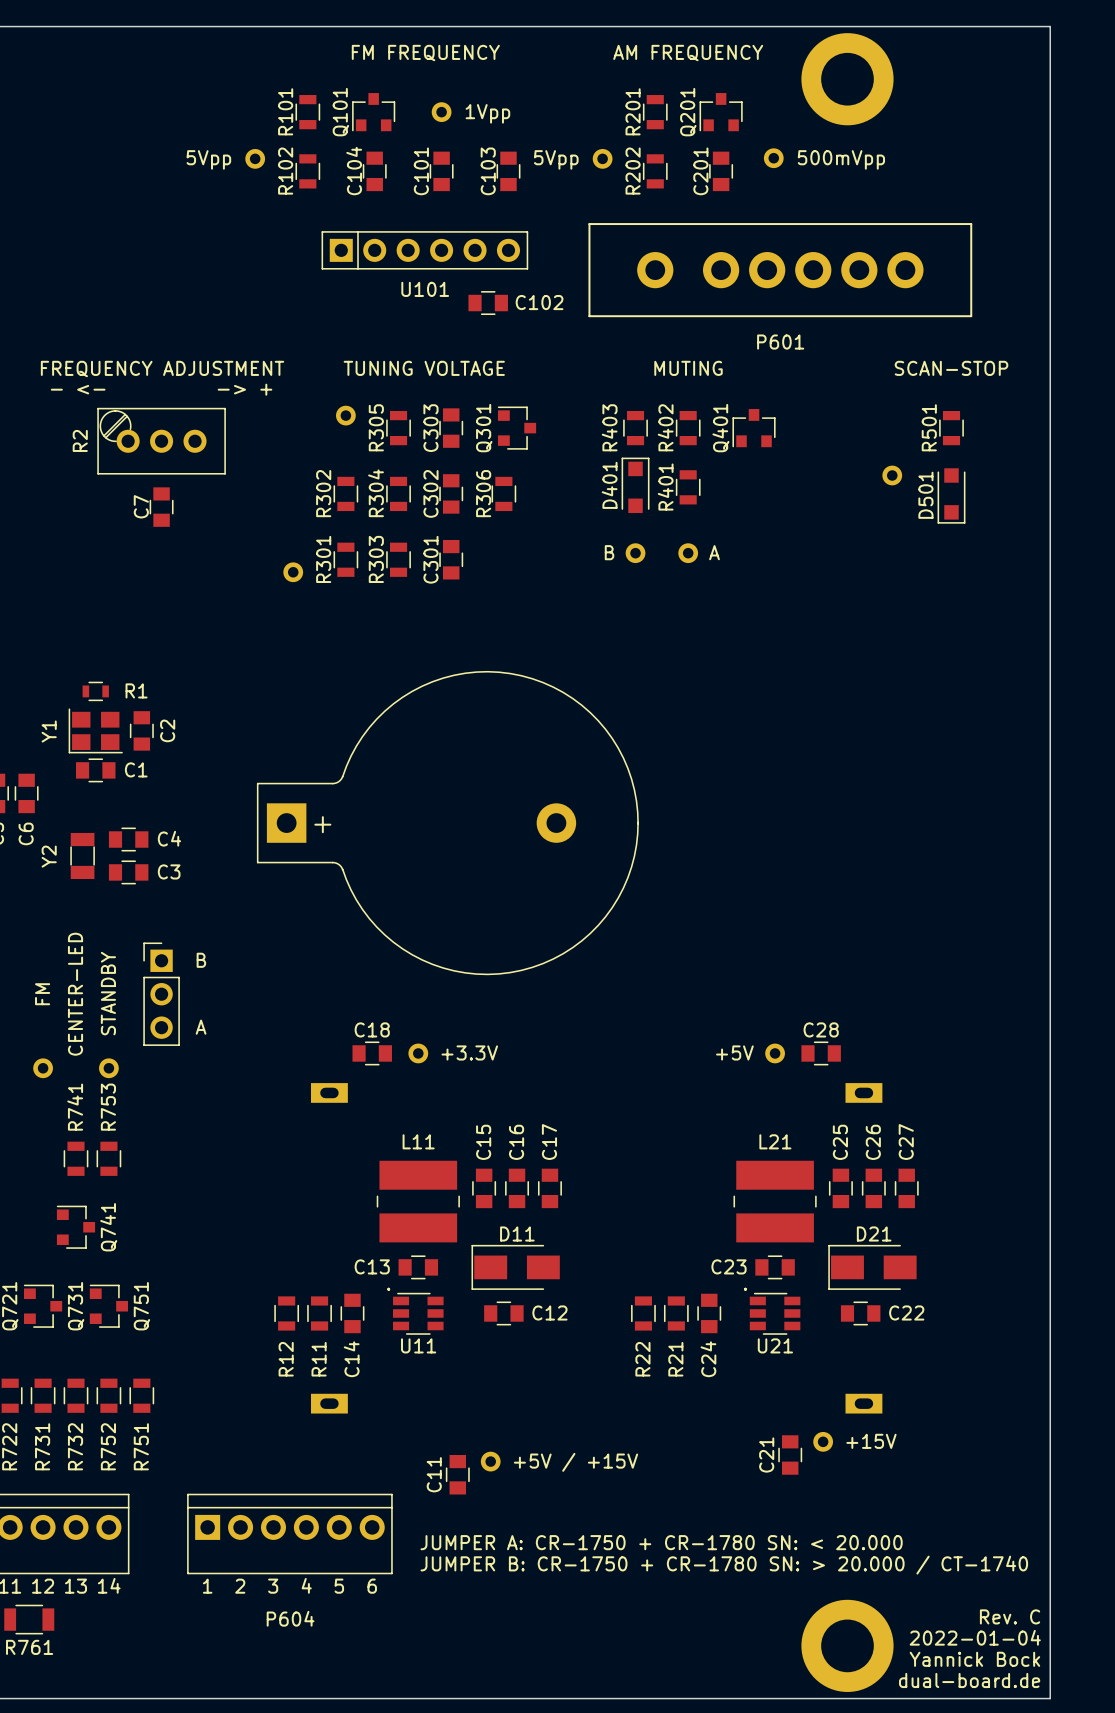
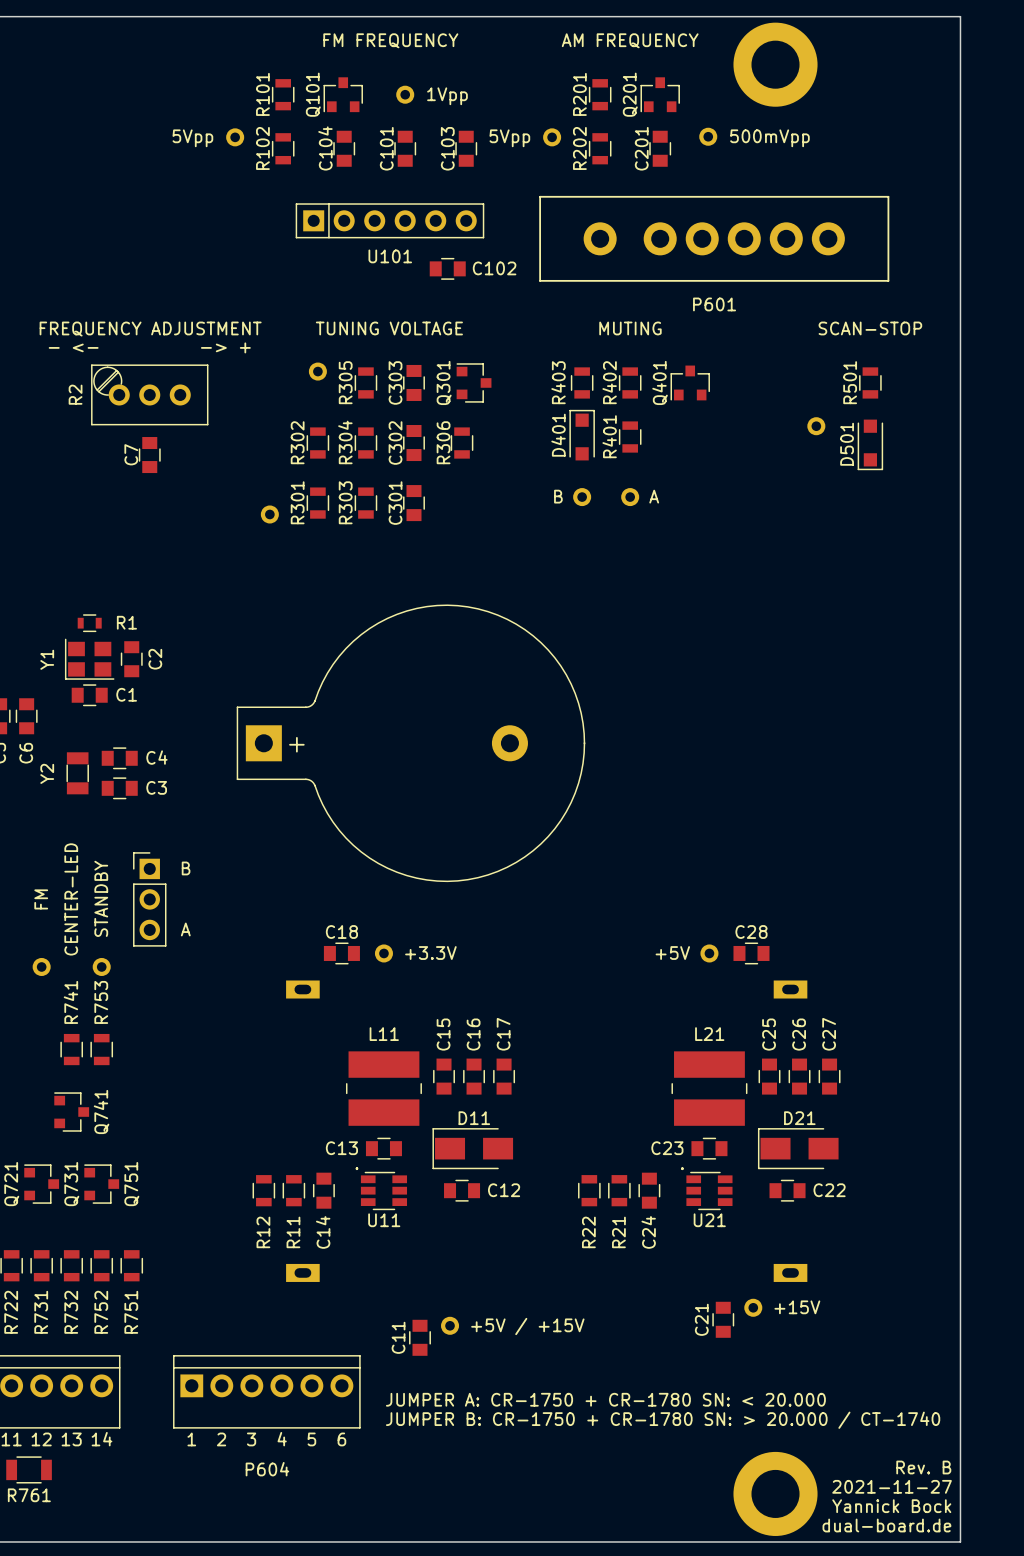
text: Rev. C (1010, 1616) -> Rev. B (923, 1467)
text: 2022-01-04 (975, 1637) -> 2021-11-27 (892, 1486)

